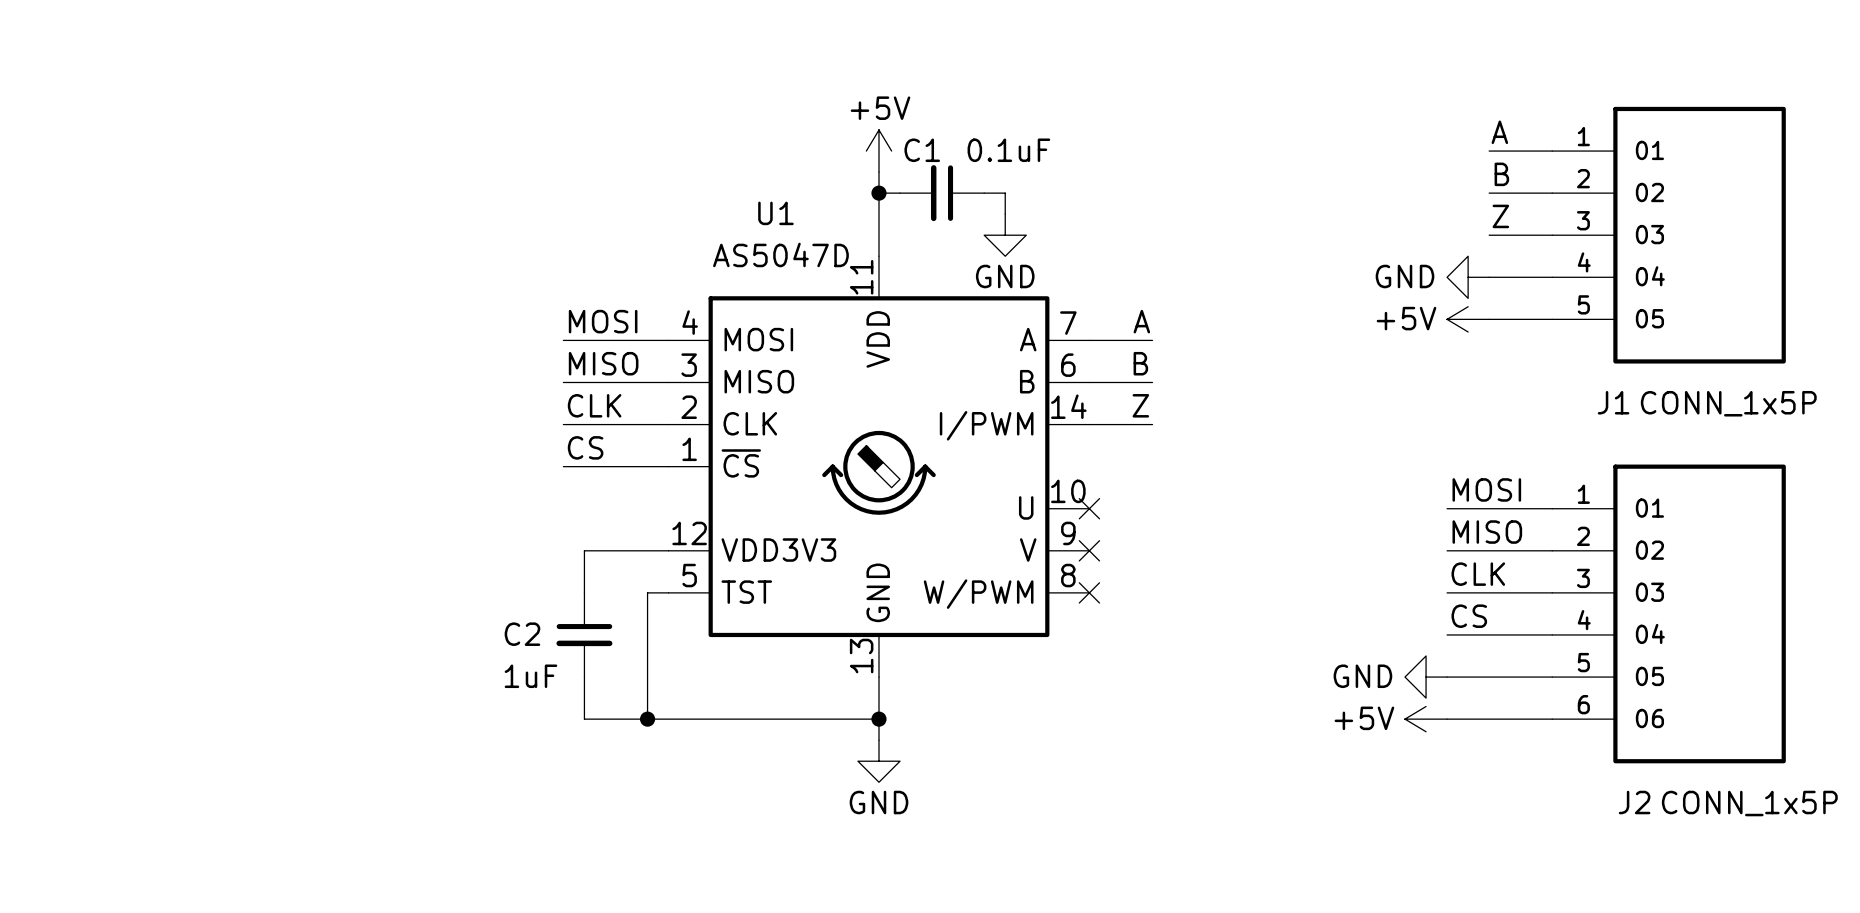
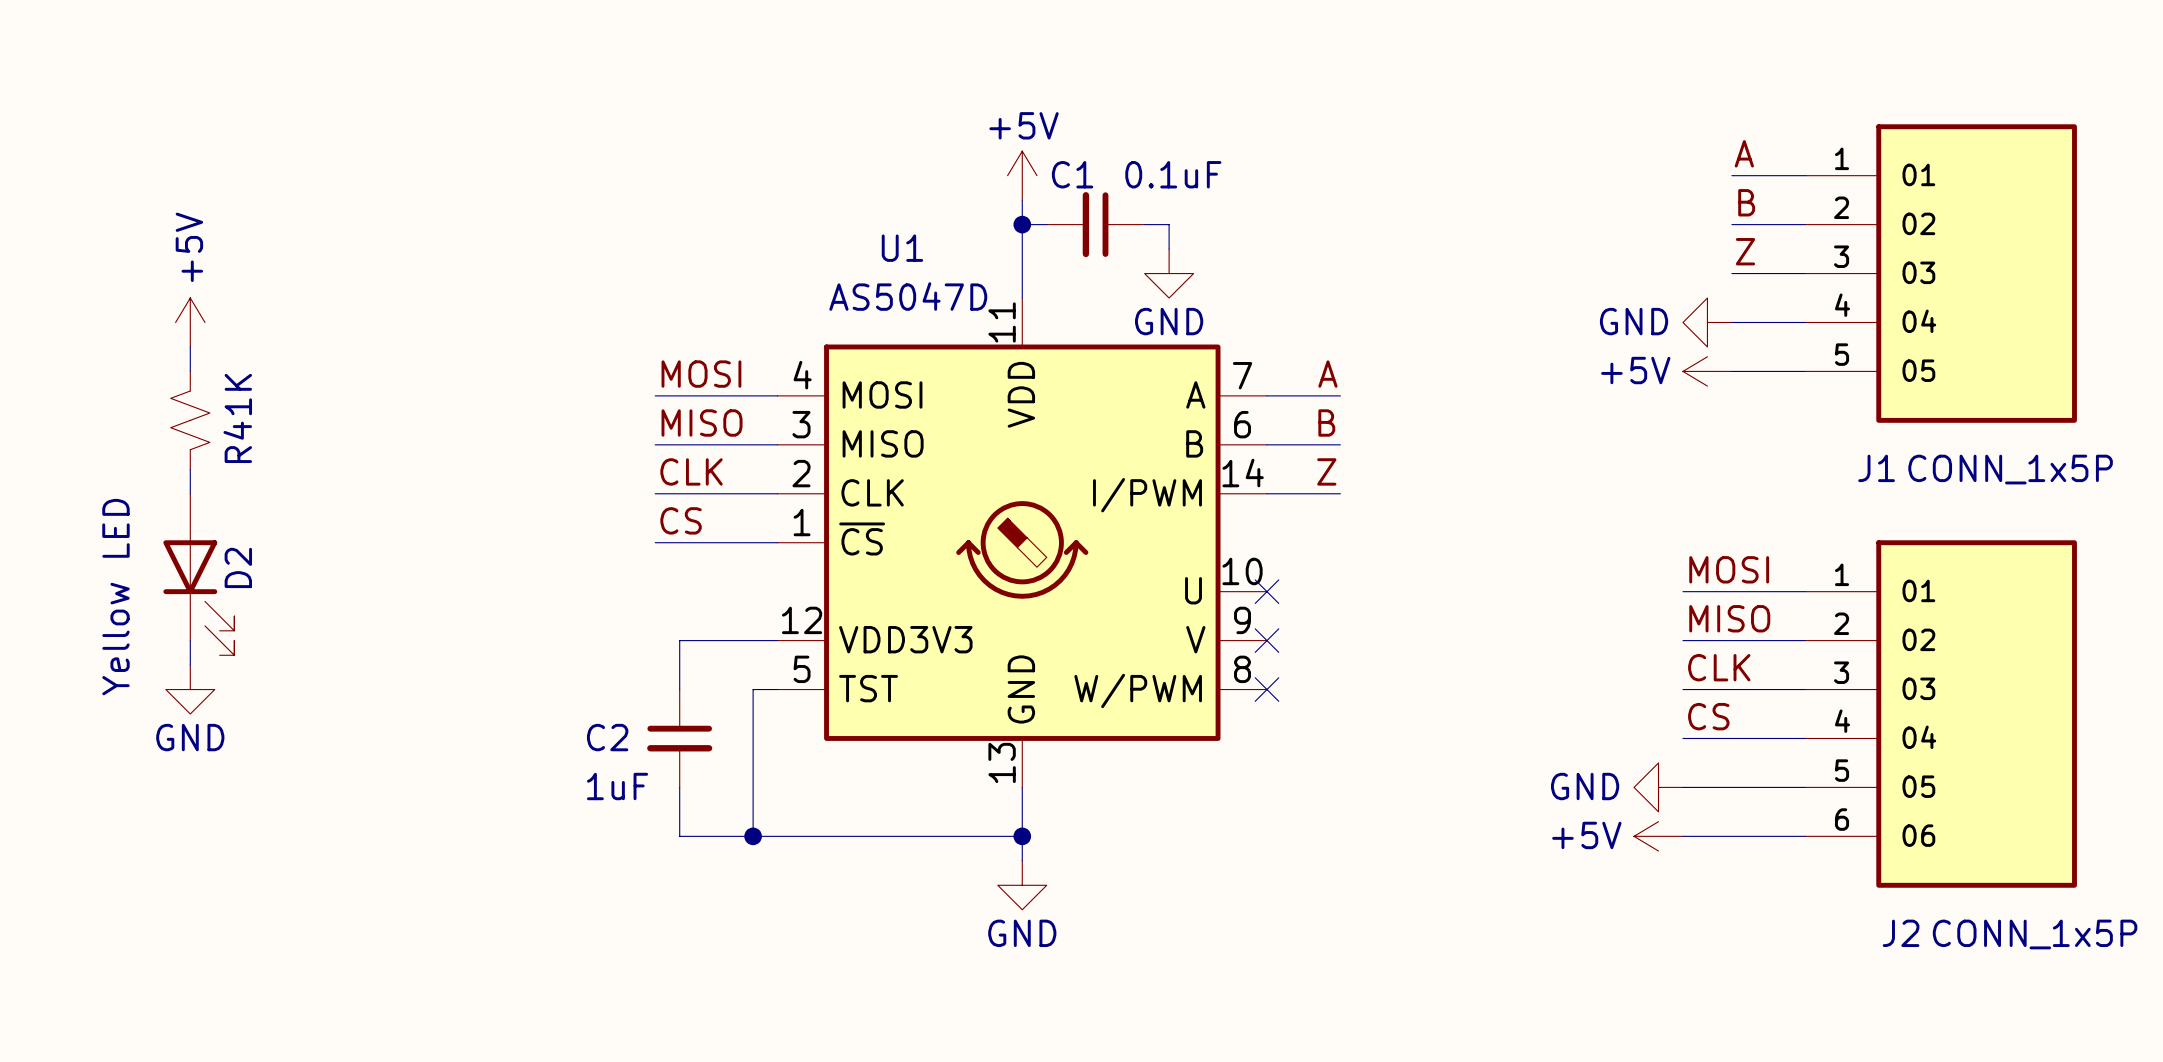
power symbol: none -> +5V (190, 322)
wire: none -> (190, 346) (190, 371)
R4: none -> 1K (190, 420)
wire: none -> (190, 469) (190, 493)
D2: none -> Yellow LED (198, 574)
wire: none -> (190, 640) (190, 665)
power symbol: none -> GND (190, 689)

